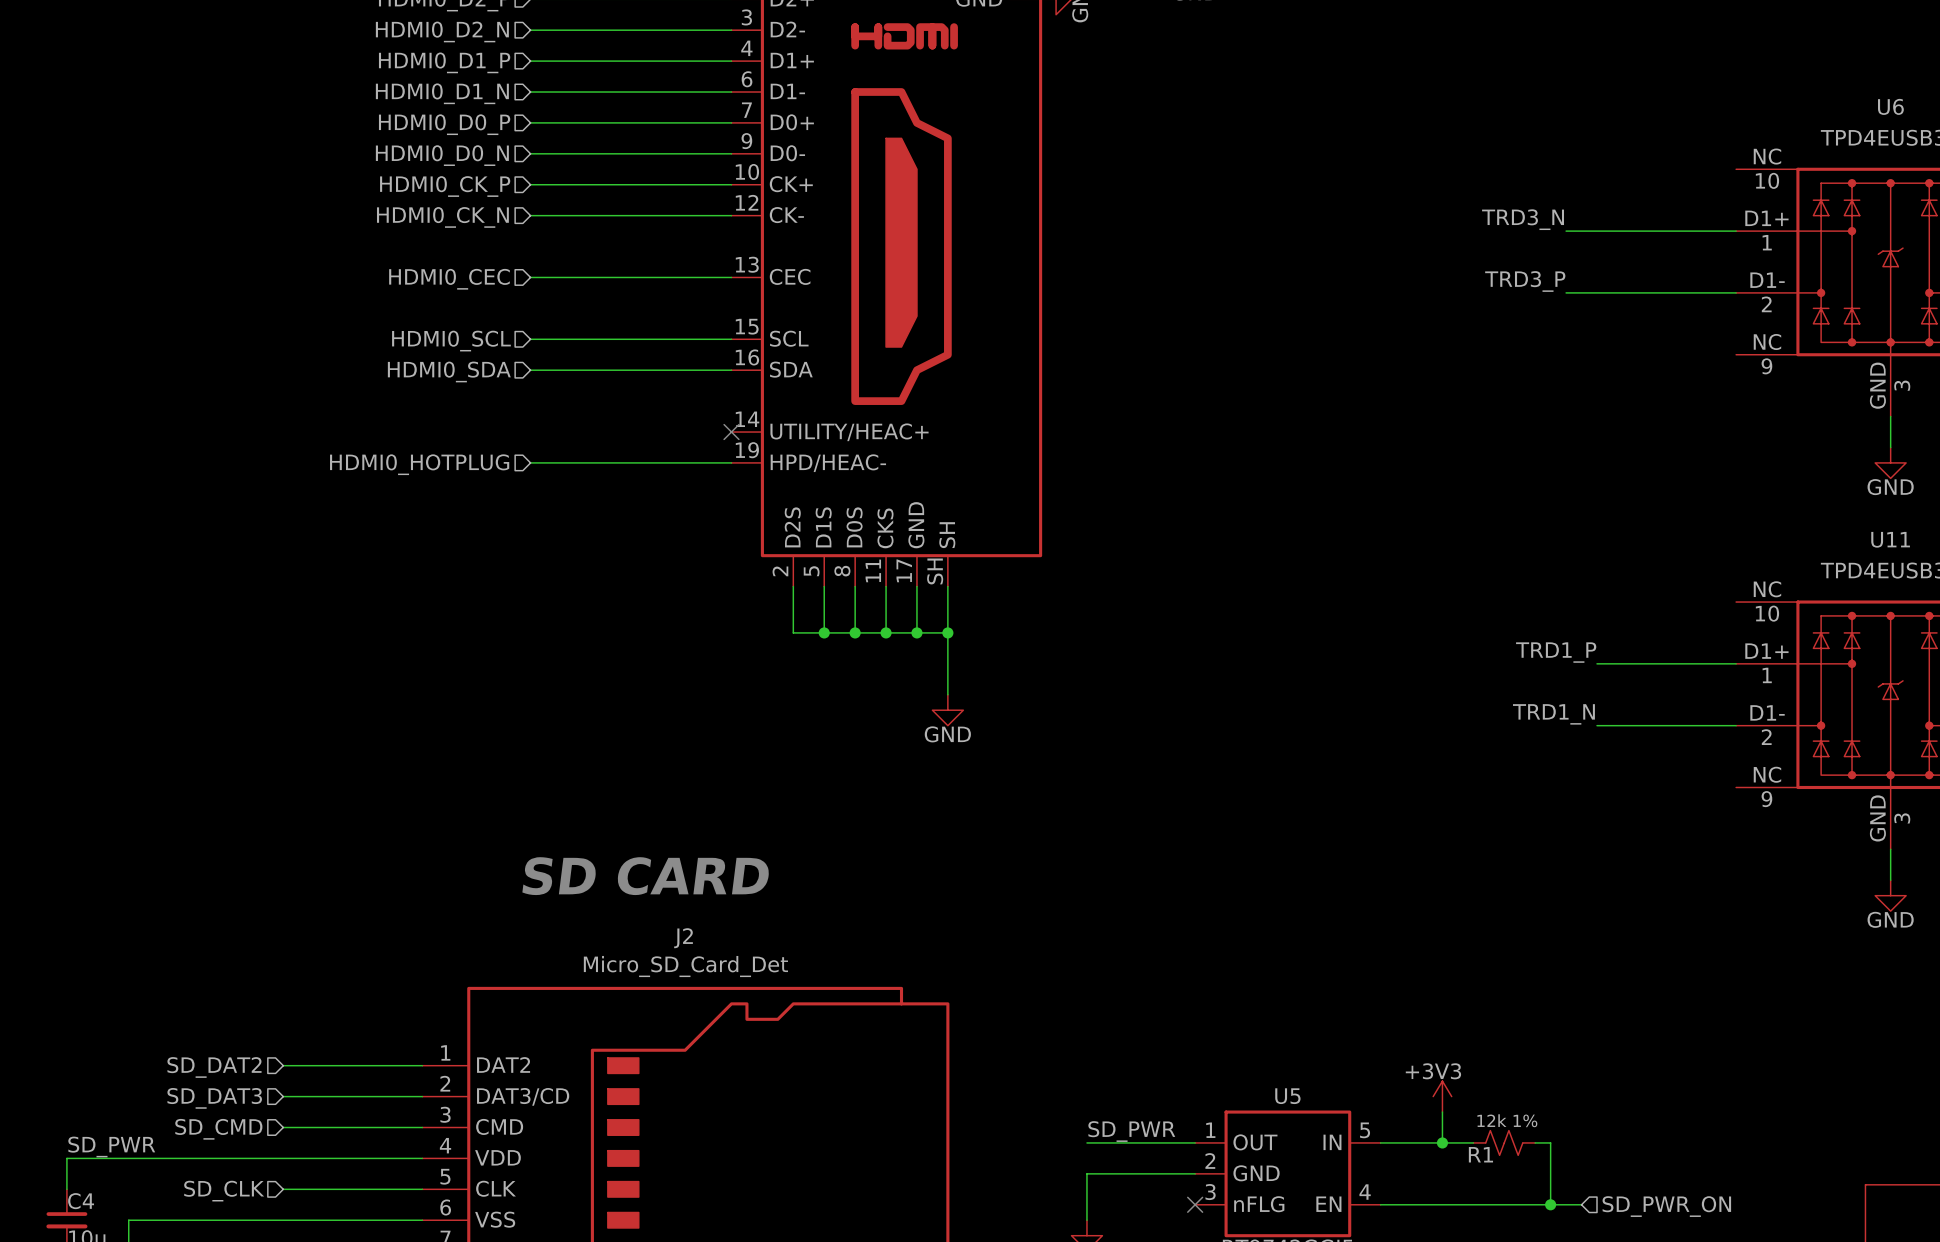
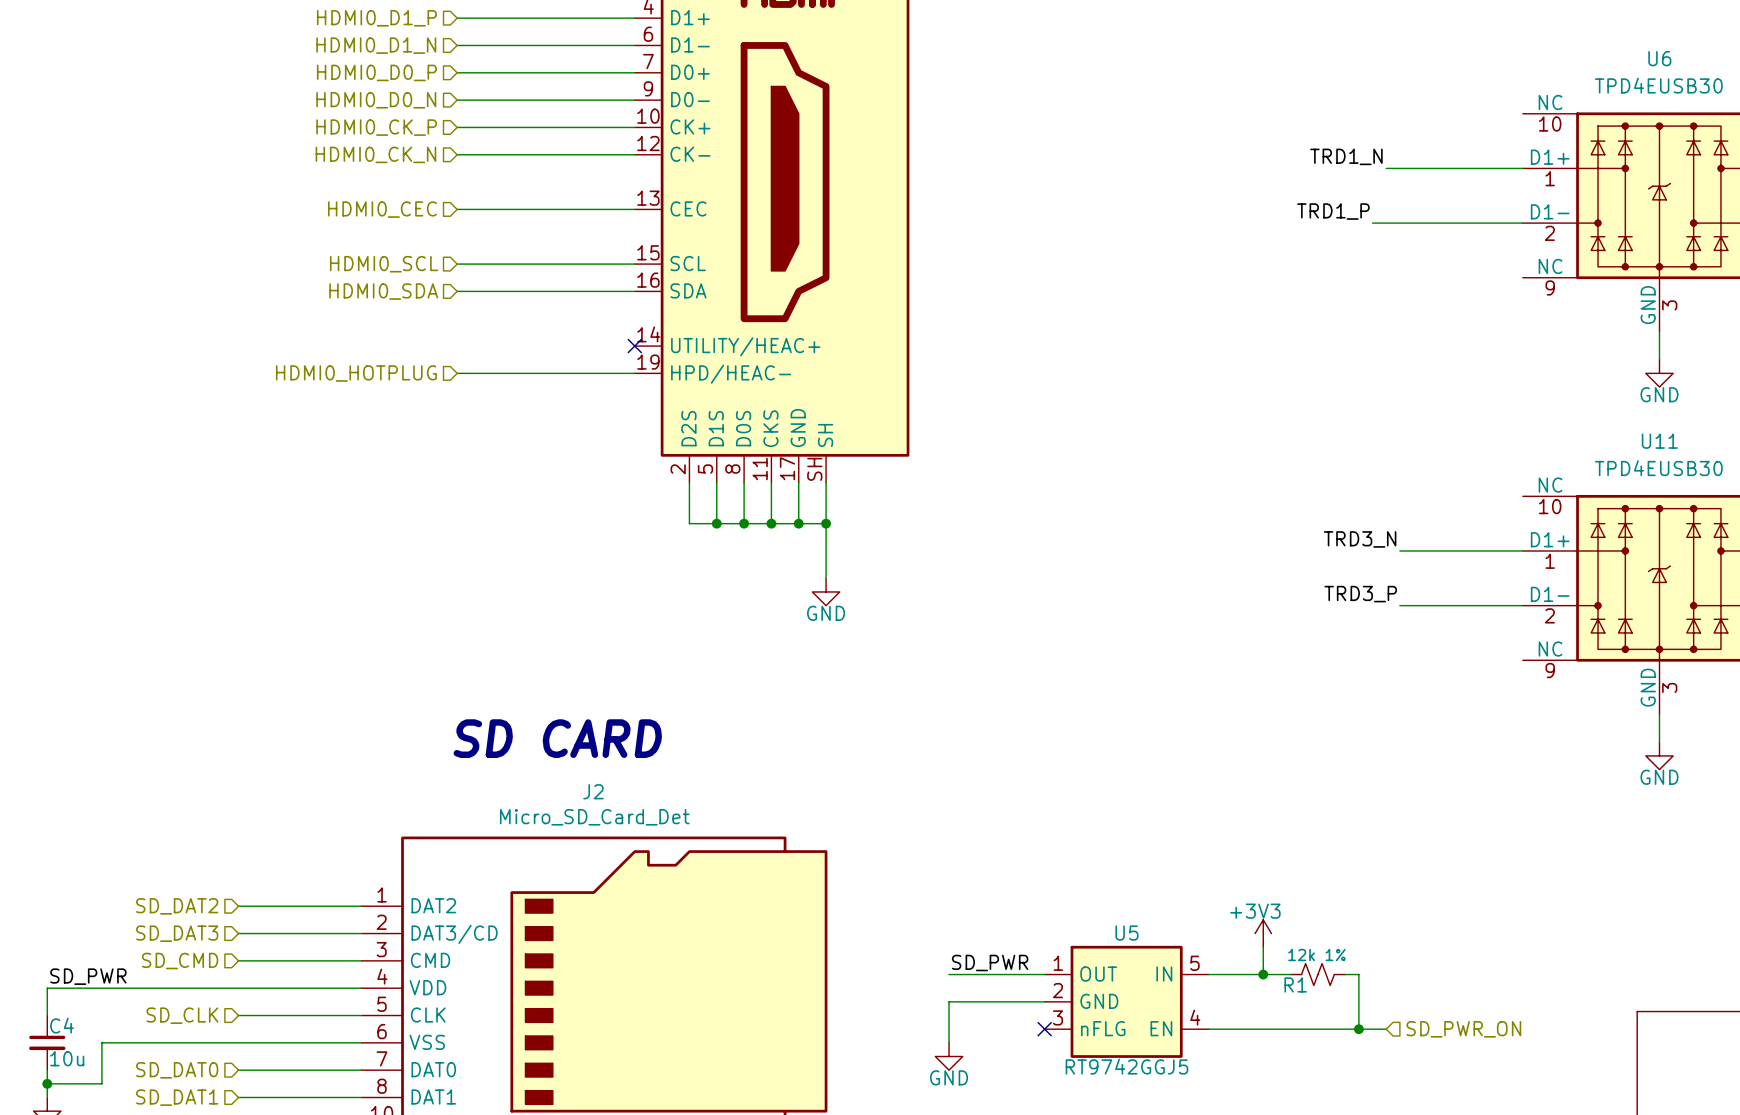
label: TRD3_N (1523, 219) -> TRD1_N (1346, 156)
wire: (1566, 231) (1581, 231) -> none
label: TRD3_P (1525, 281) -> TRD1_P (1333, 211)
label: TRD1_P (1556, 652) -> TRD3_N (1360, 539)
label: TRD1_N (1553, 714) -> TRD3_P (1360, 594)

